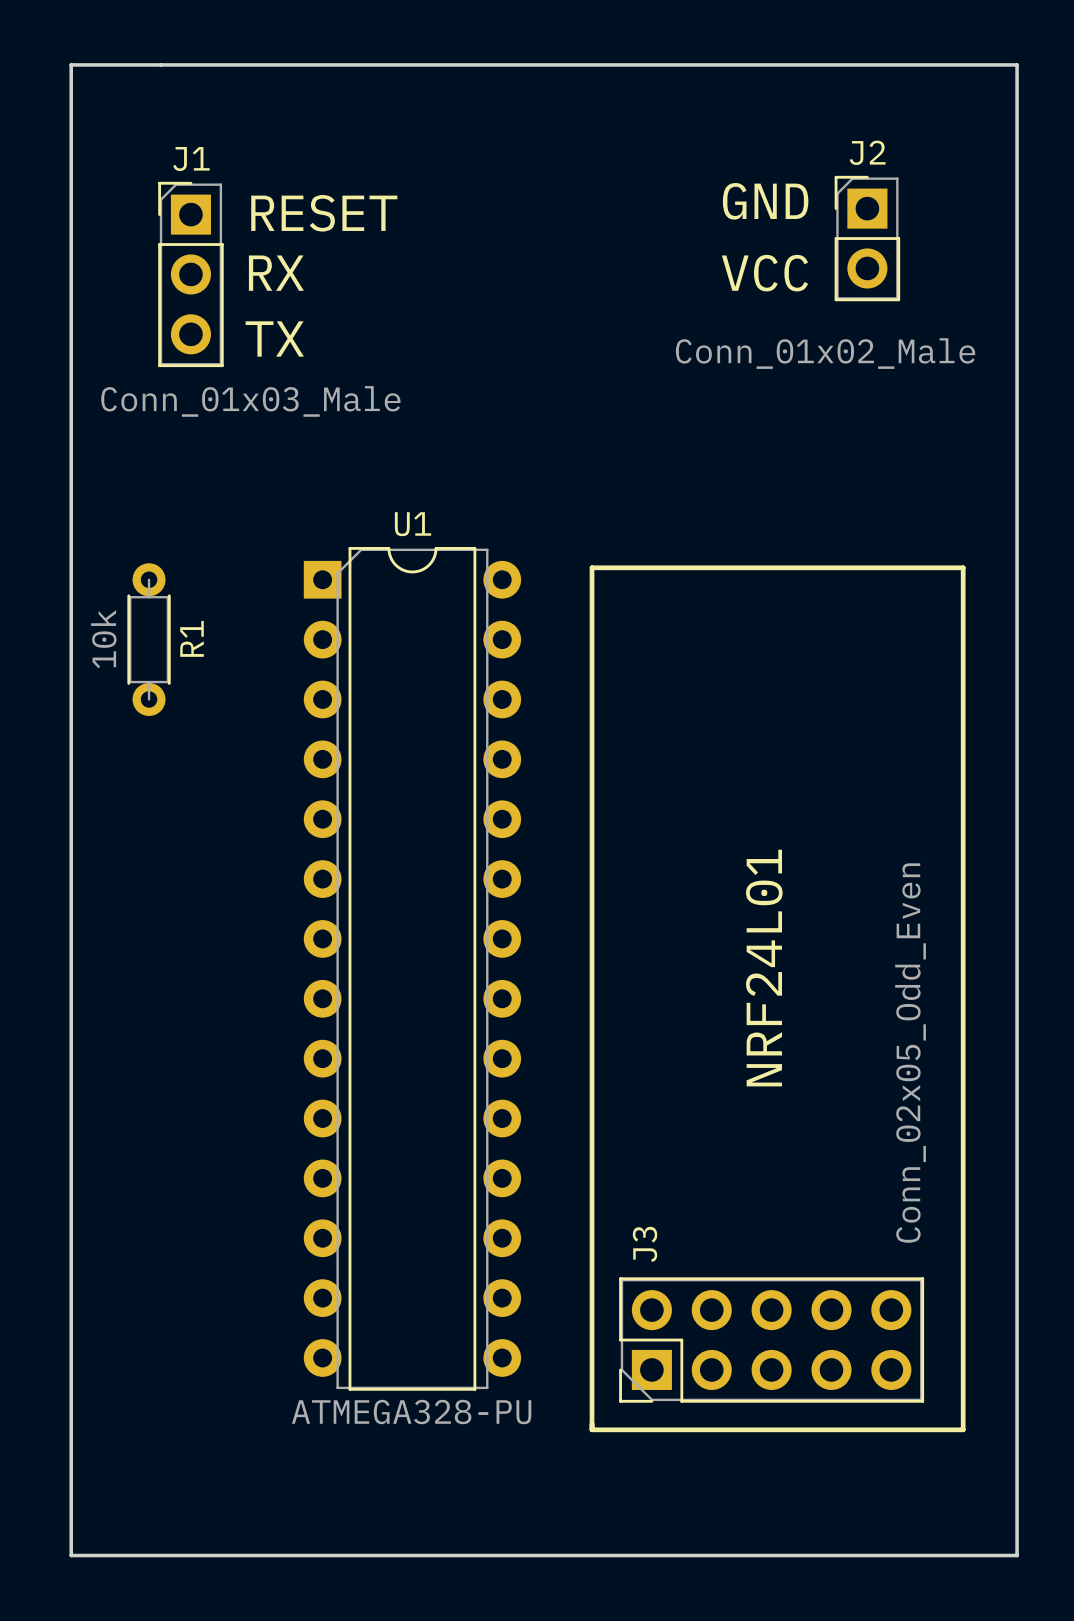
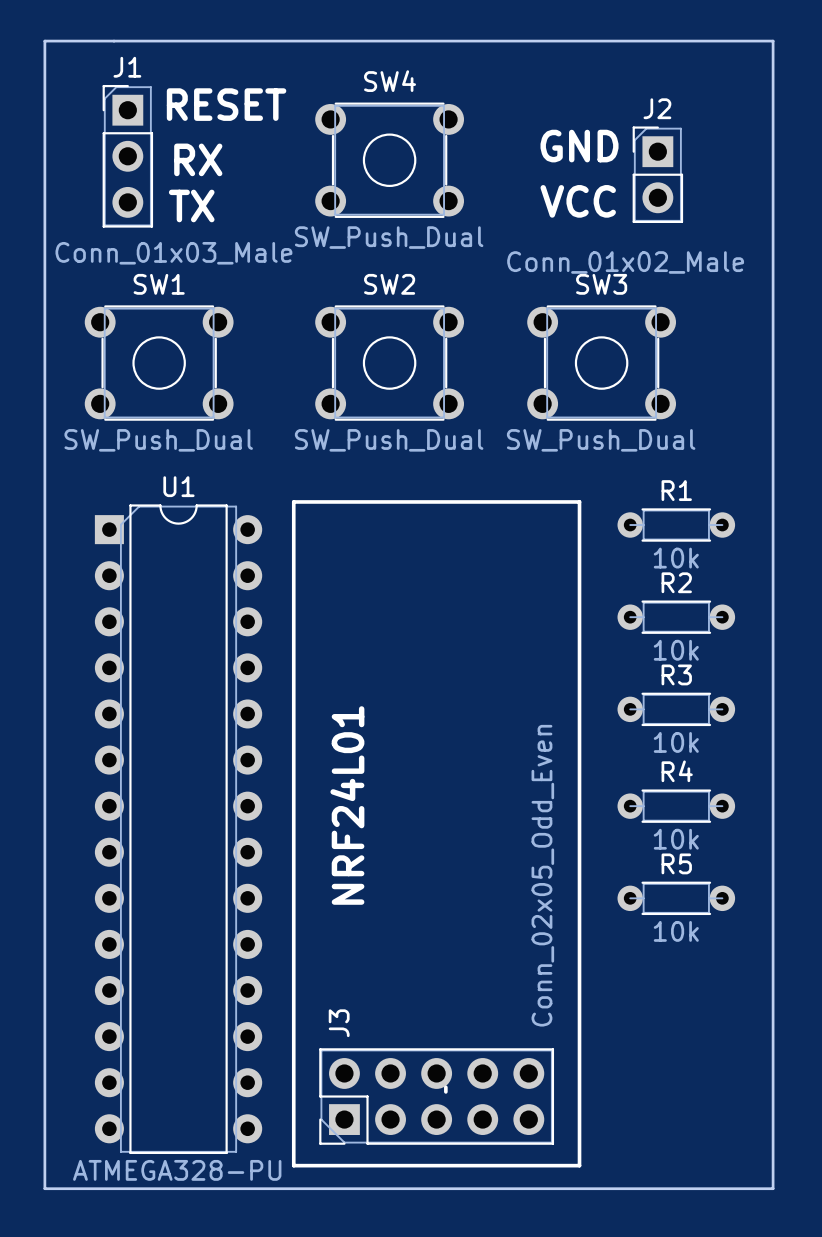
text position: RESET (324, 213) -> RESET (226, 104)
SW4: none -> SW_Push_Dual (389, 160)
text position: RX (276, 273) -> RX (198, 159)
J1 position: (190, 274) -> (127, 156)
text position: TX (274, 338) -> TX (191, 205)
SW1: none -> SW_Push_Dual (159, 363)
SW2: none -> SW_Push_Dual (389, 363)
SW3: none -> SW_Push_Dual (601, 363)
R1 name position: R1 (192, 638) -> R1 (676, 490)
R1 value position: 10k (103, 639) -> 10k (676, 558)
R1 rotation: 0° (149, 639) -> 90° clockwise (676, 525)
R1 position: (149, 639) -> (676, 525)
line: none -> (293, 501) (579, 501) (579, 1165) (293, 1165) (293, 501)
R2: none -> 10k (676, 617)
R3: none -> 10k (676, 709)
U1 position: (412, 968) -> (178, 829)
text position: NRF24L01 (764, 968) -> NRF24L01 (347, 805)
R4: none -> 10k (676, 806)
R5: none -> 10k (676, 898)
J3 position: (771, 1340) -> (436, 1096)
line: (592, 1423) (592, 567) (963, 567) (963, 1429) (592, 1429) -> none

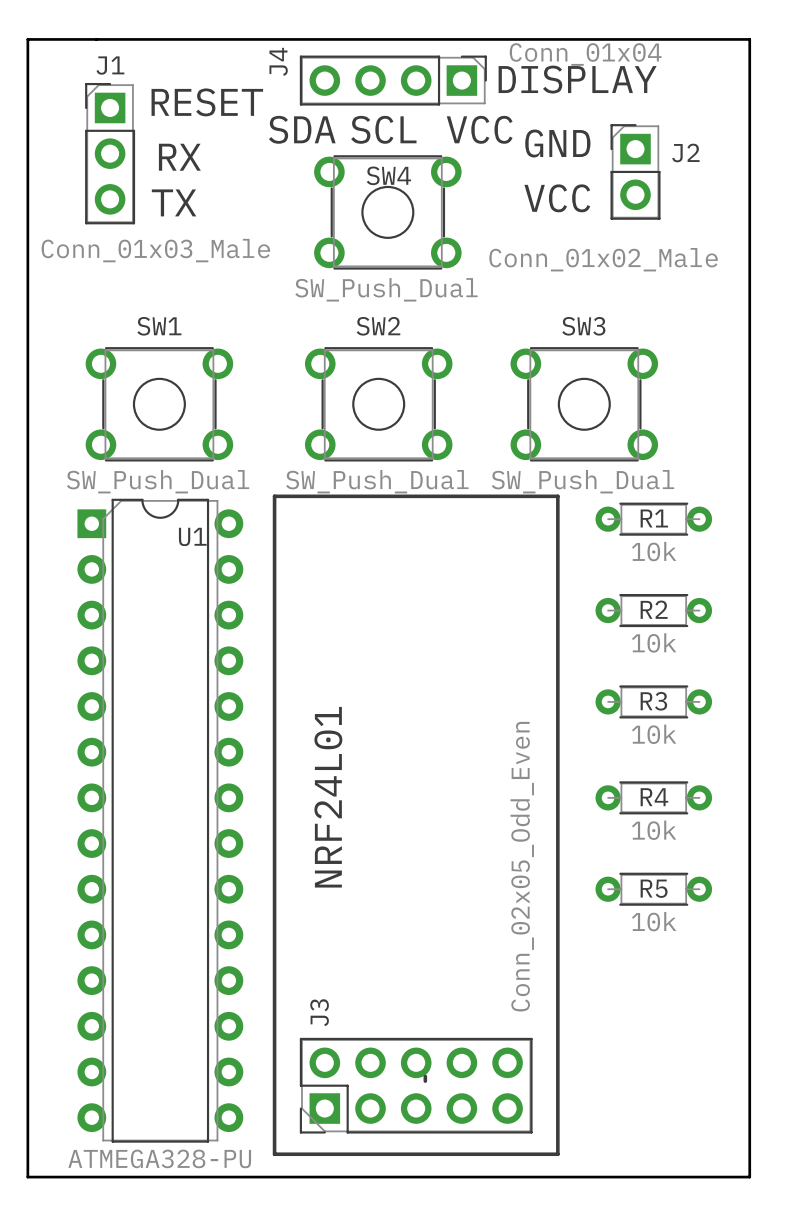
SW4 name position: SW4 (390, 81) -> SW4 (388, 175)
text: none -> DISPLAY (577, 79)
J4: none -> Conn_01x04 (393, 80)
J2 name position: J2 (657, 108) -> J2 (685, 152)
text: none -> SDA (302, 129)
text: none -> SCL (383, 129)
text: none -> VCC (479, 129)
SW4 position: (389, 160) -> (387, 212)
SW1 position: (159, 363) -> (159, 404)
SW2 position: (389, 363) -> (378, 404)
SW3 position: (601, 363) -> (584, 404)
U1 name position: U1 (178, 486) -> U1 (192, 536)
R1 name position: R1 (676, 490) -> R1 (654, 518)
R2 name position: R2 (676, 582) -> R2 (654, 609)
R3 name position: R3 (676, 674) -> R3 (653, 701)
R4 name position: R4 (677, 771) -> R4 (654, 797)
R5 name position: R5 (676, 863) -> R5 (654, 888)

